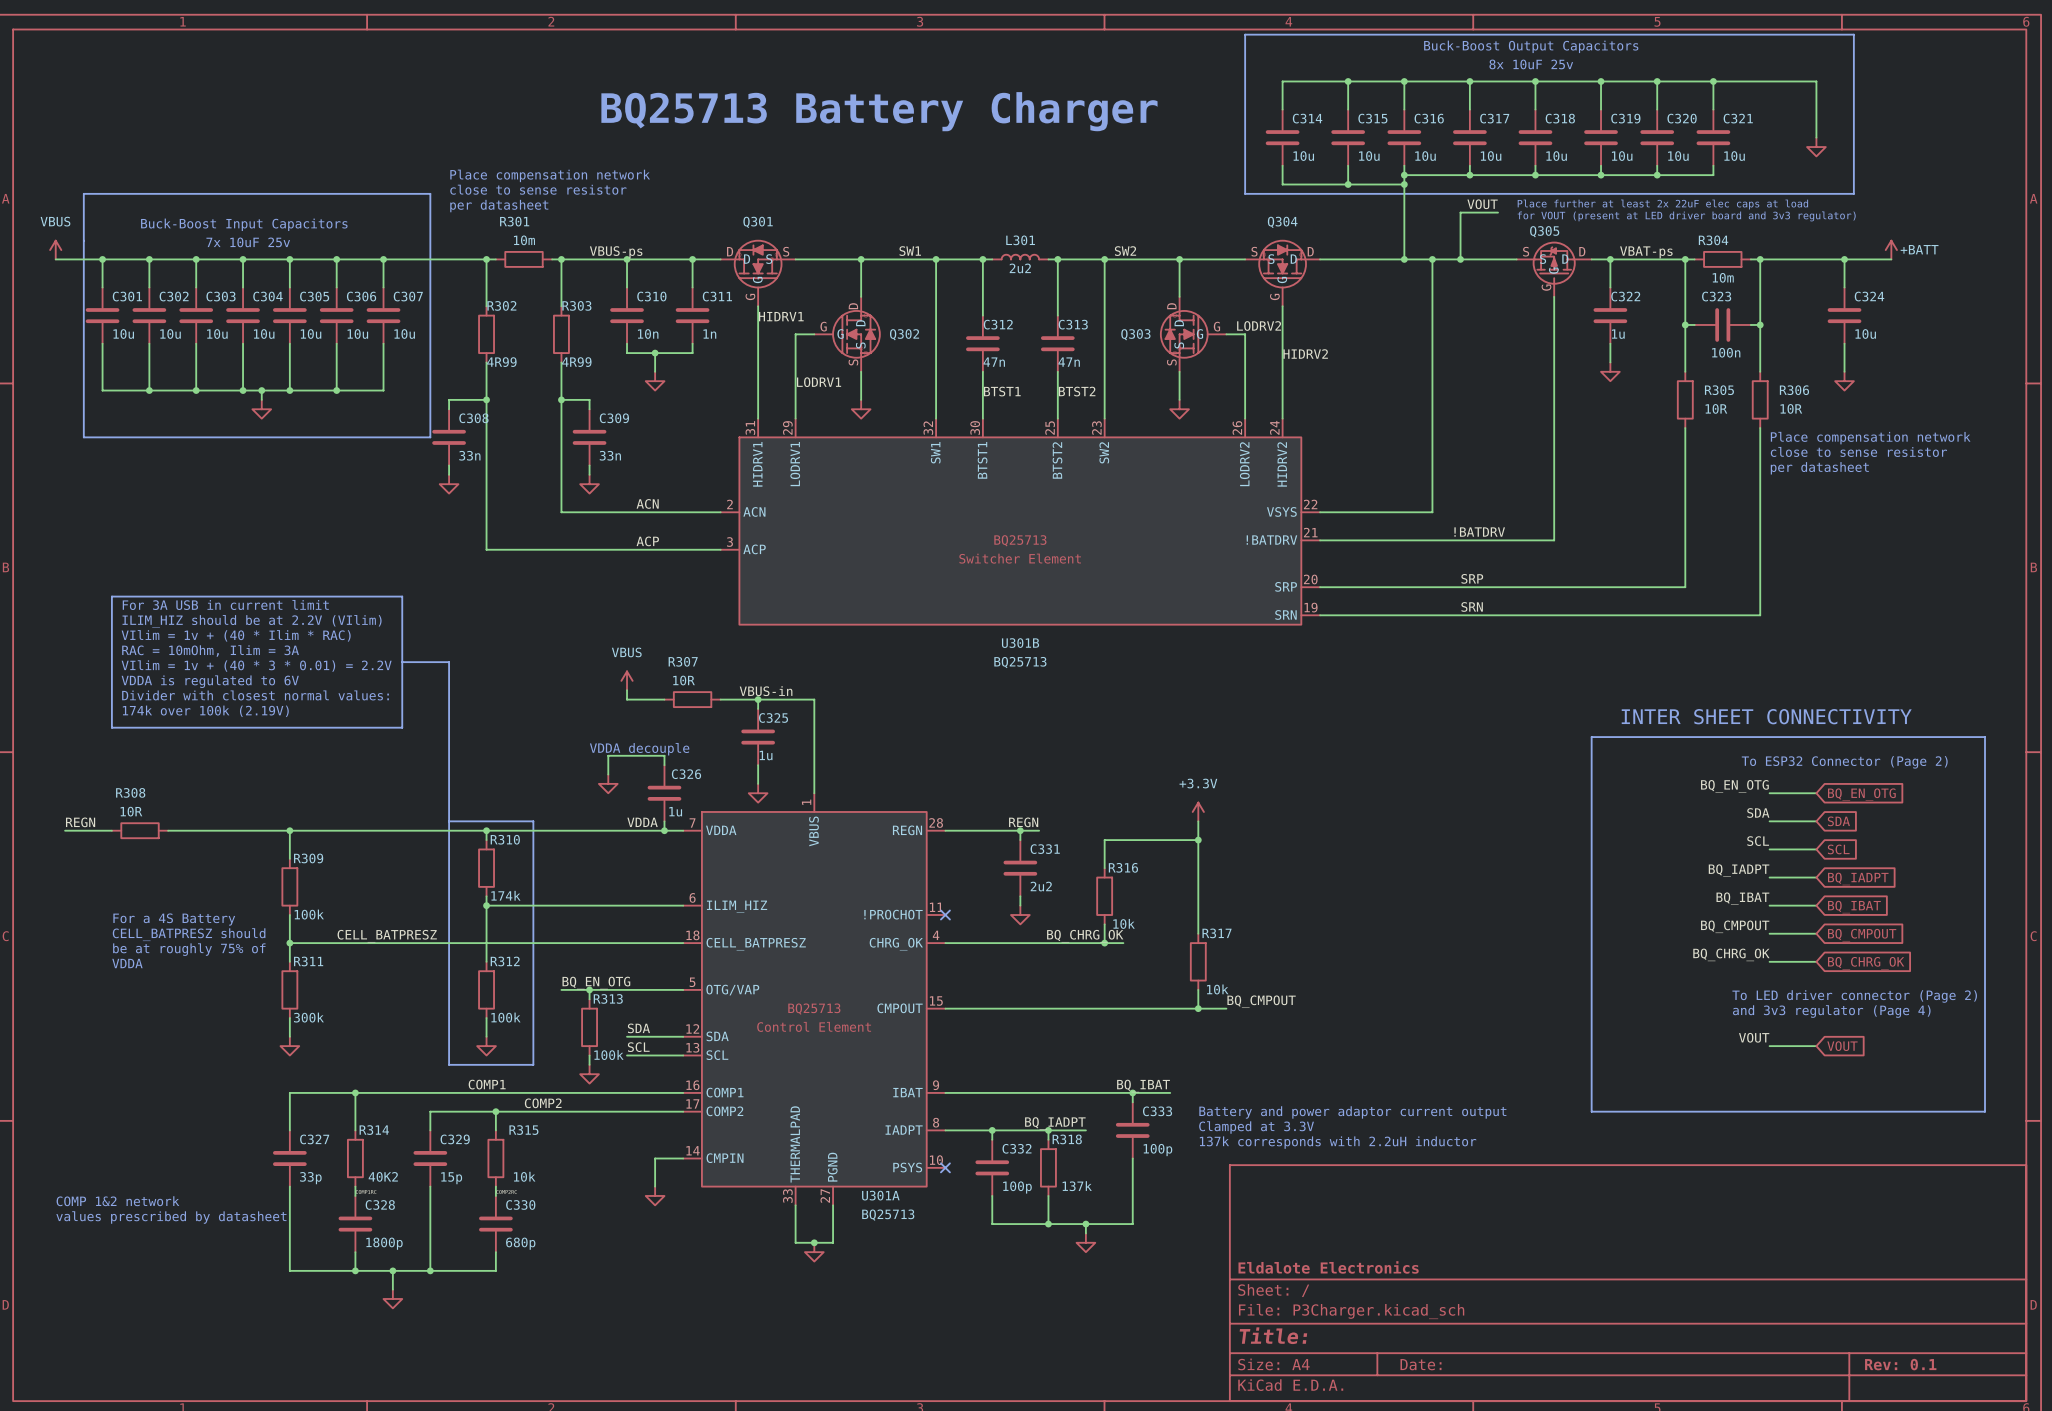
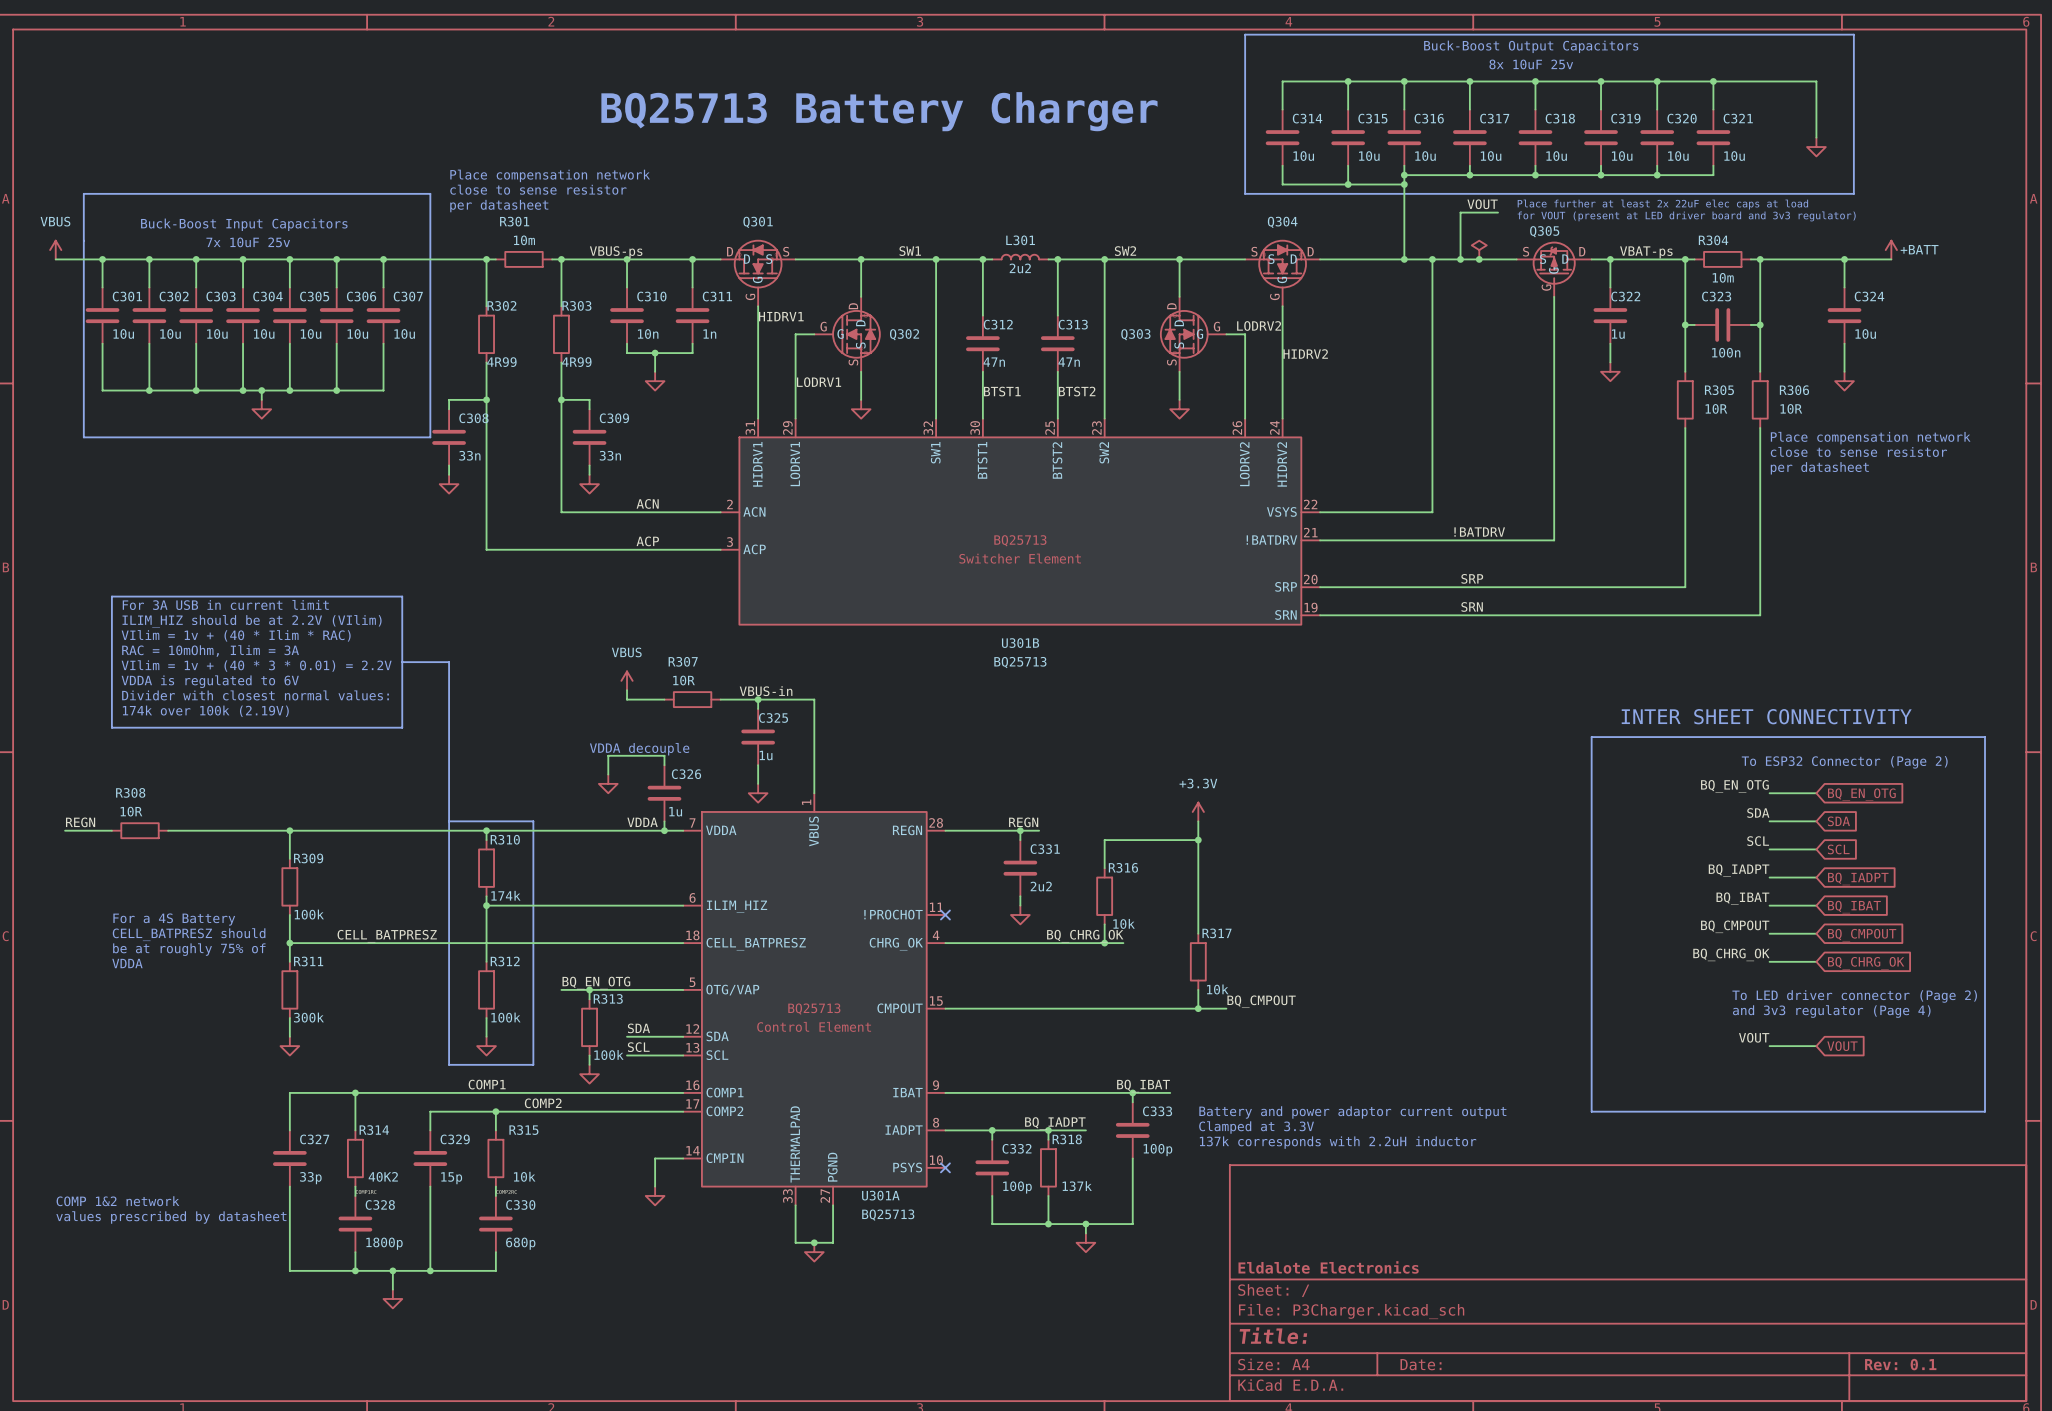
power symbol: none -> (1479, 250)
junction: none -> (1479, 259)

